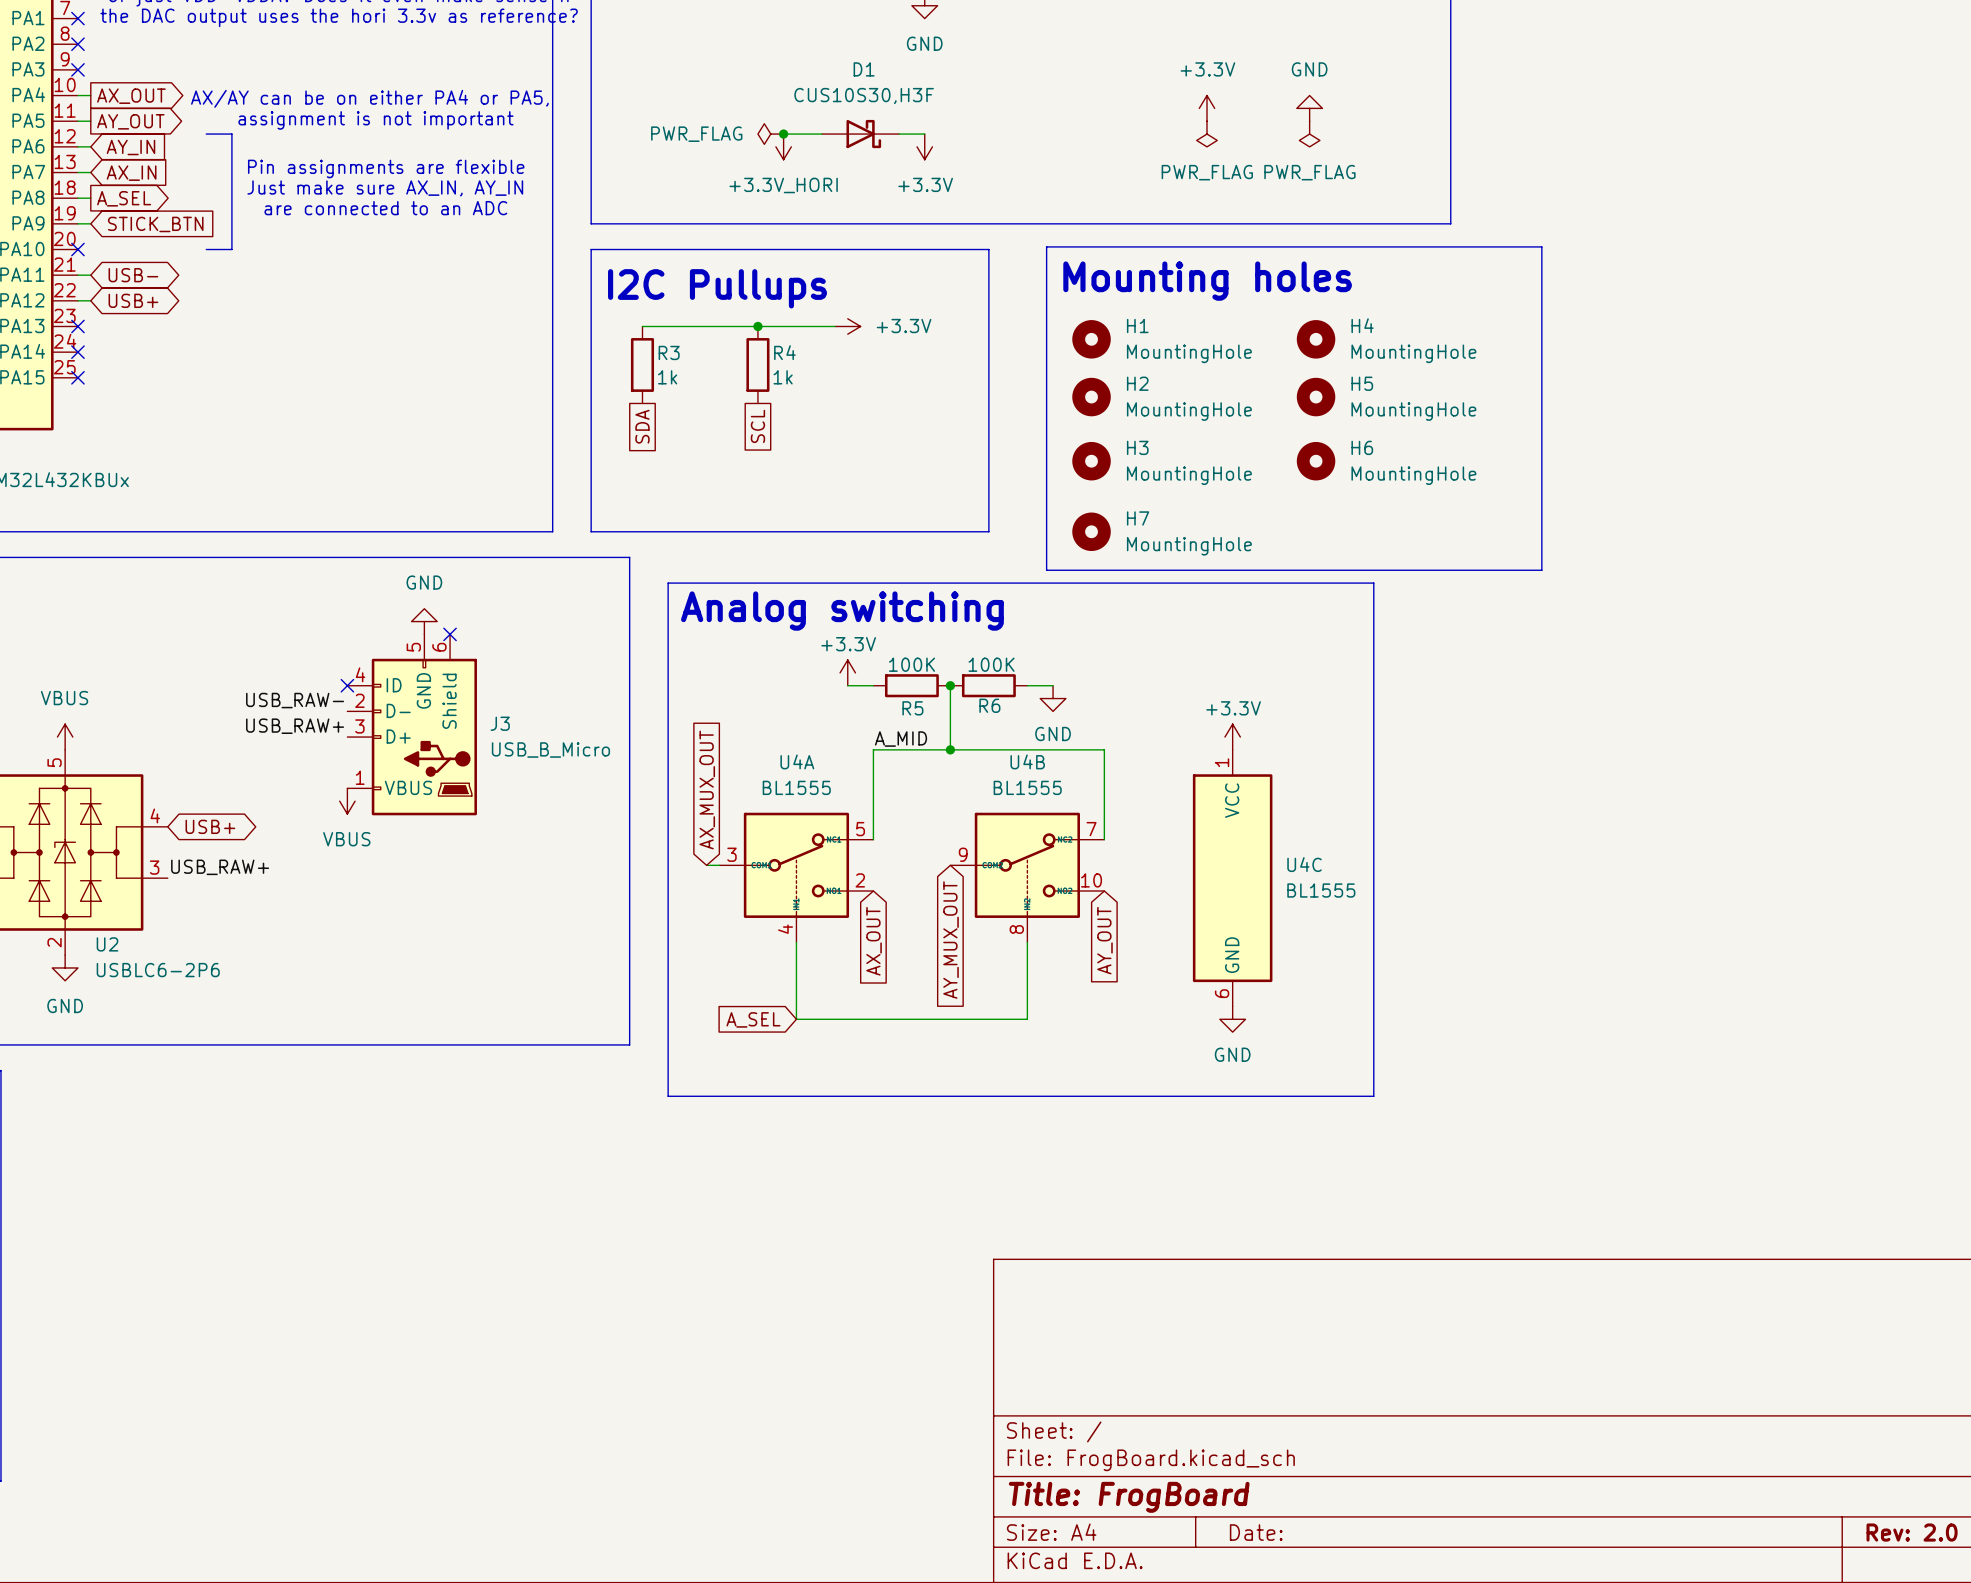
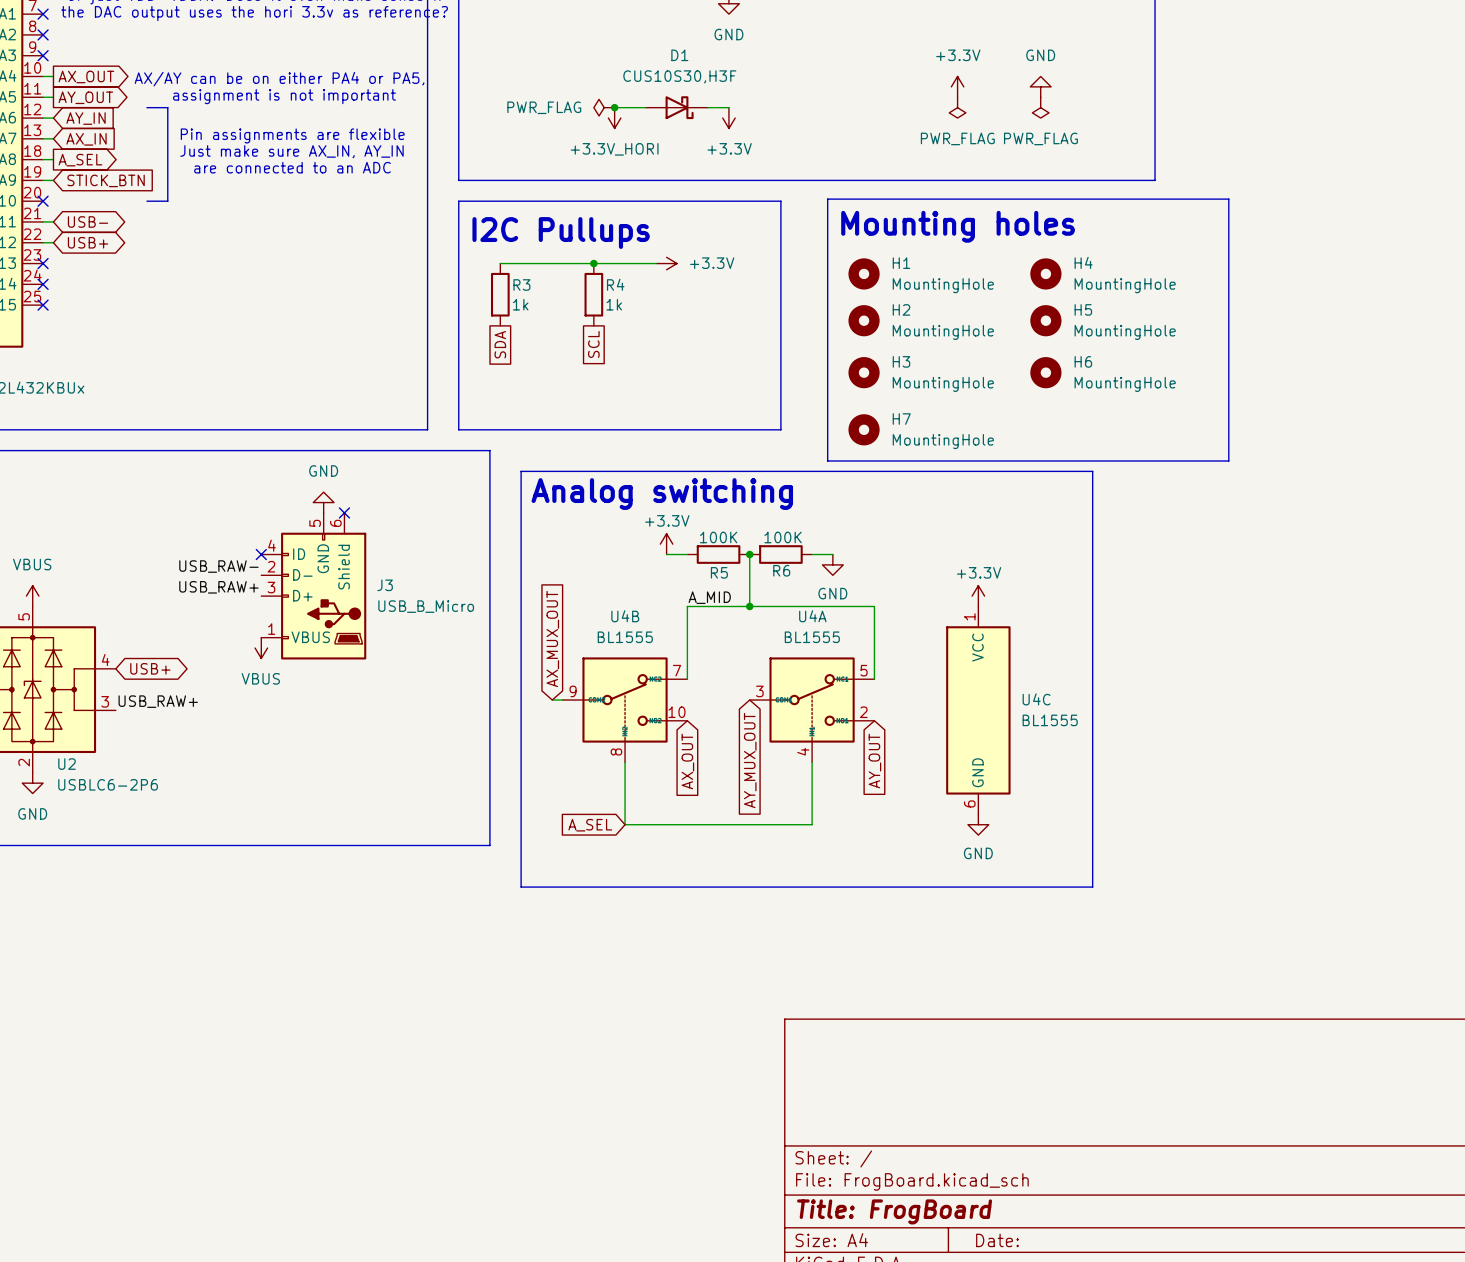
U4A position: (796, 877) -> (812, 709)
U4B position: (1027, 877) -> (625, 709)

